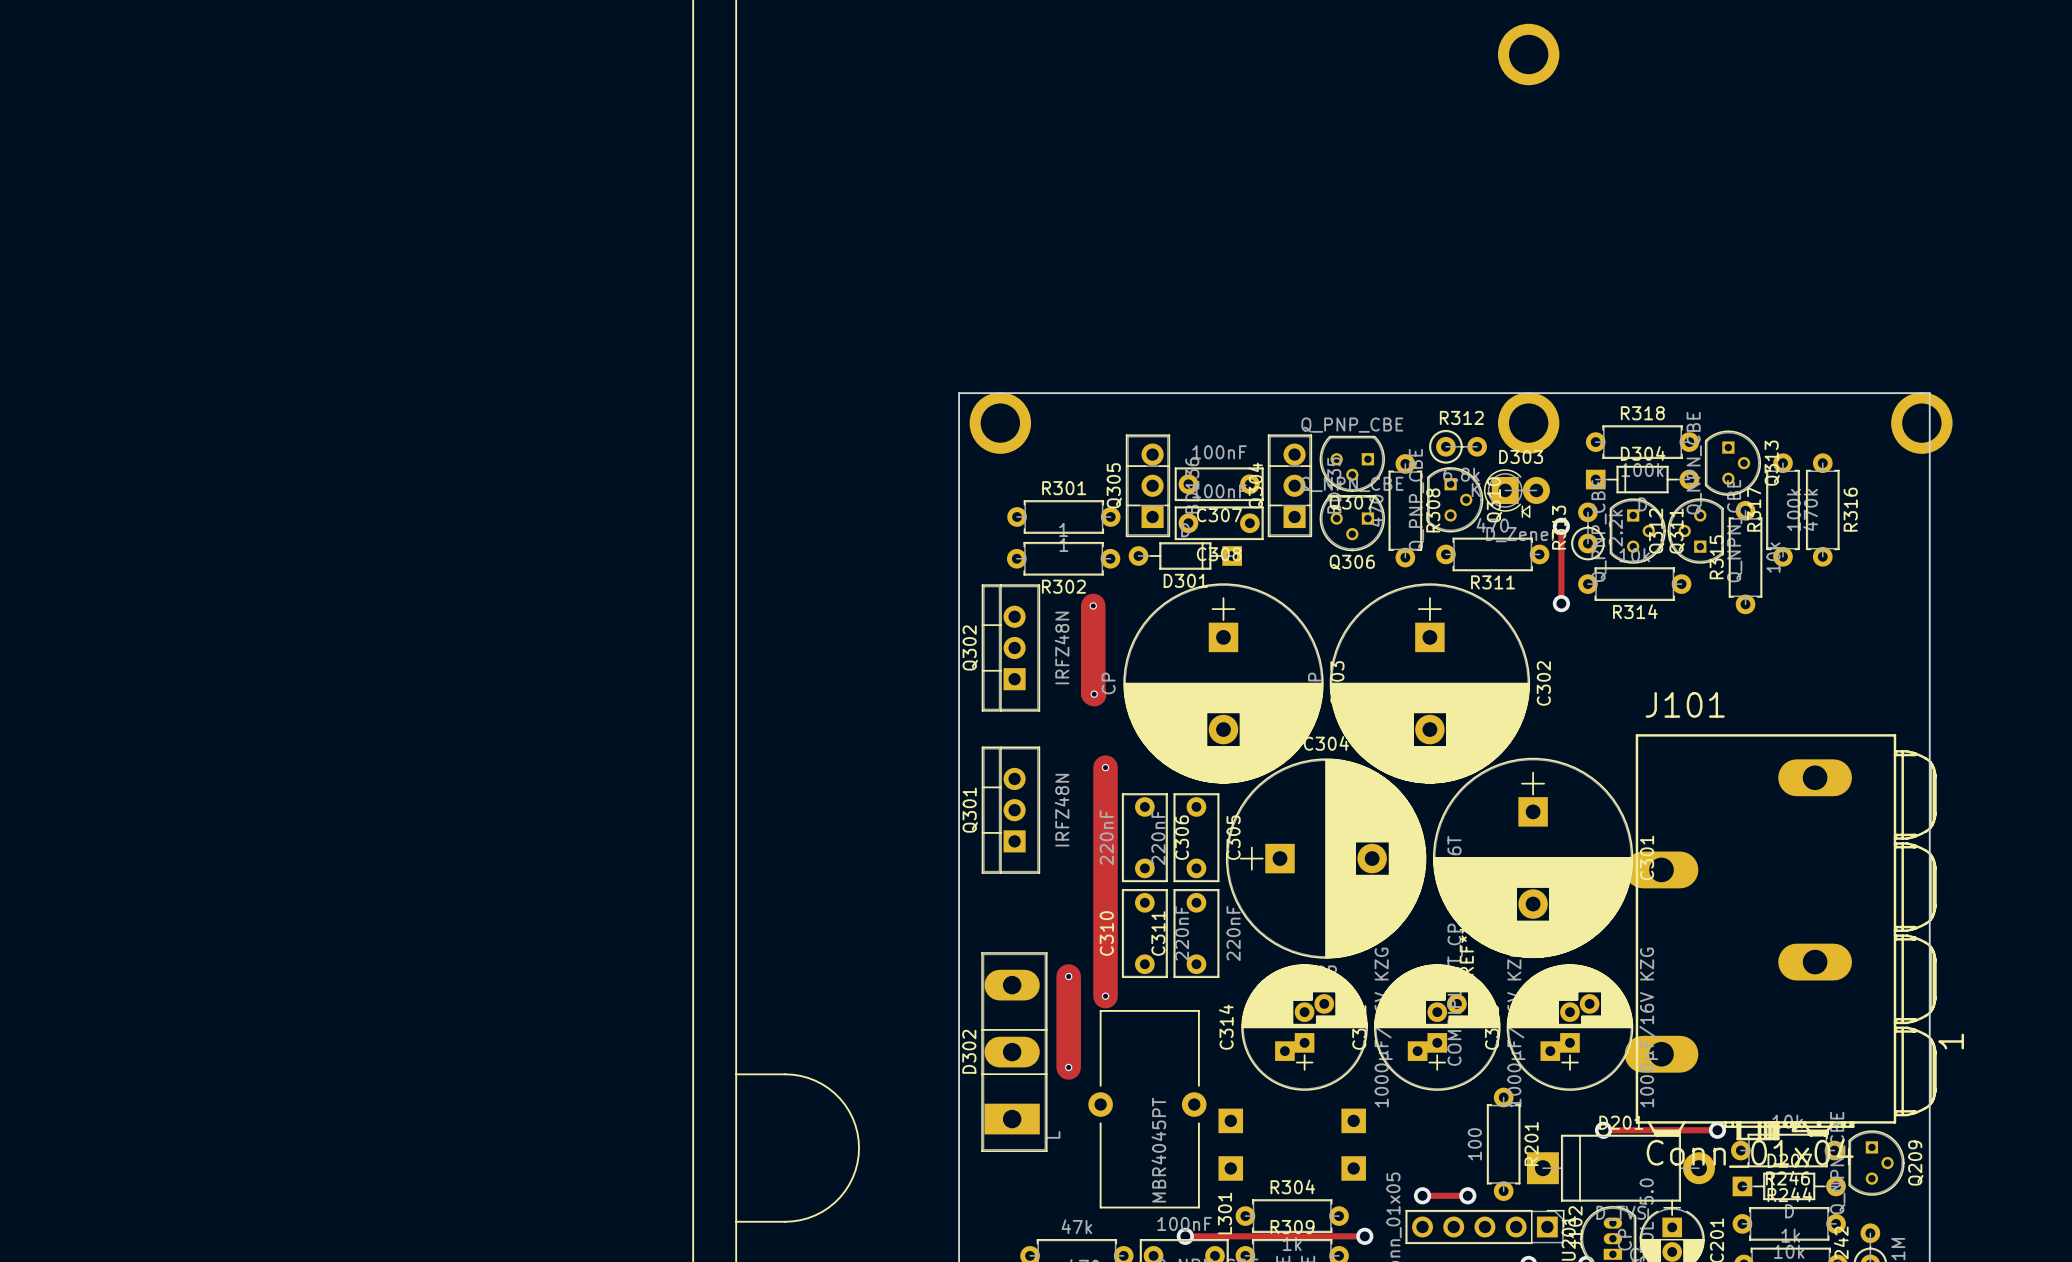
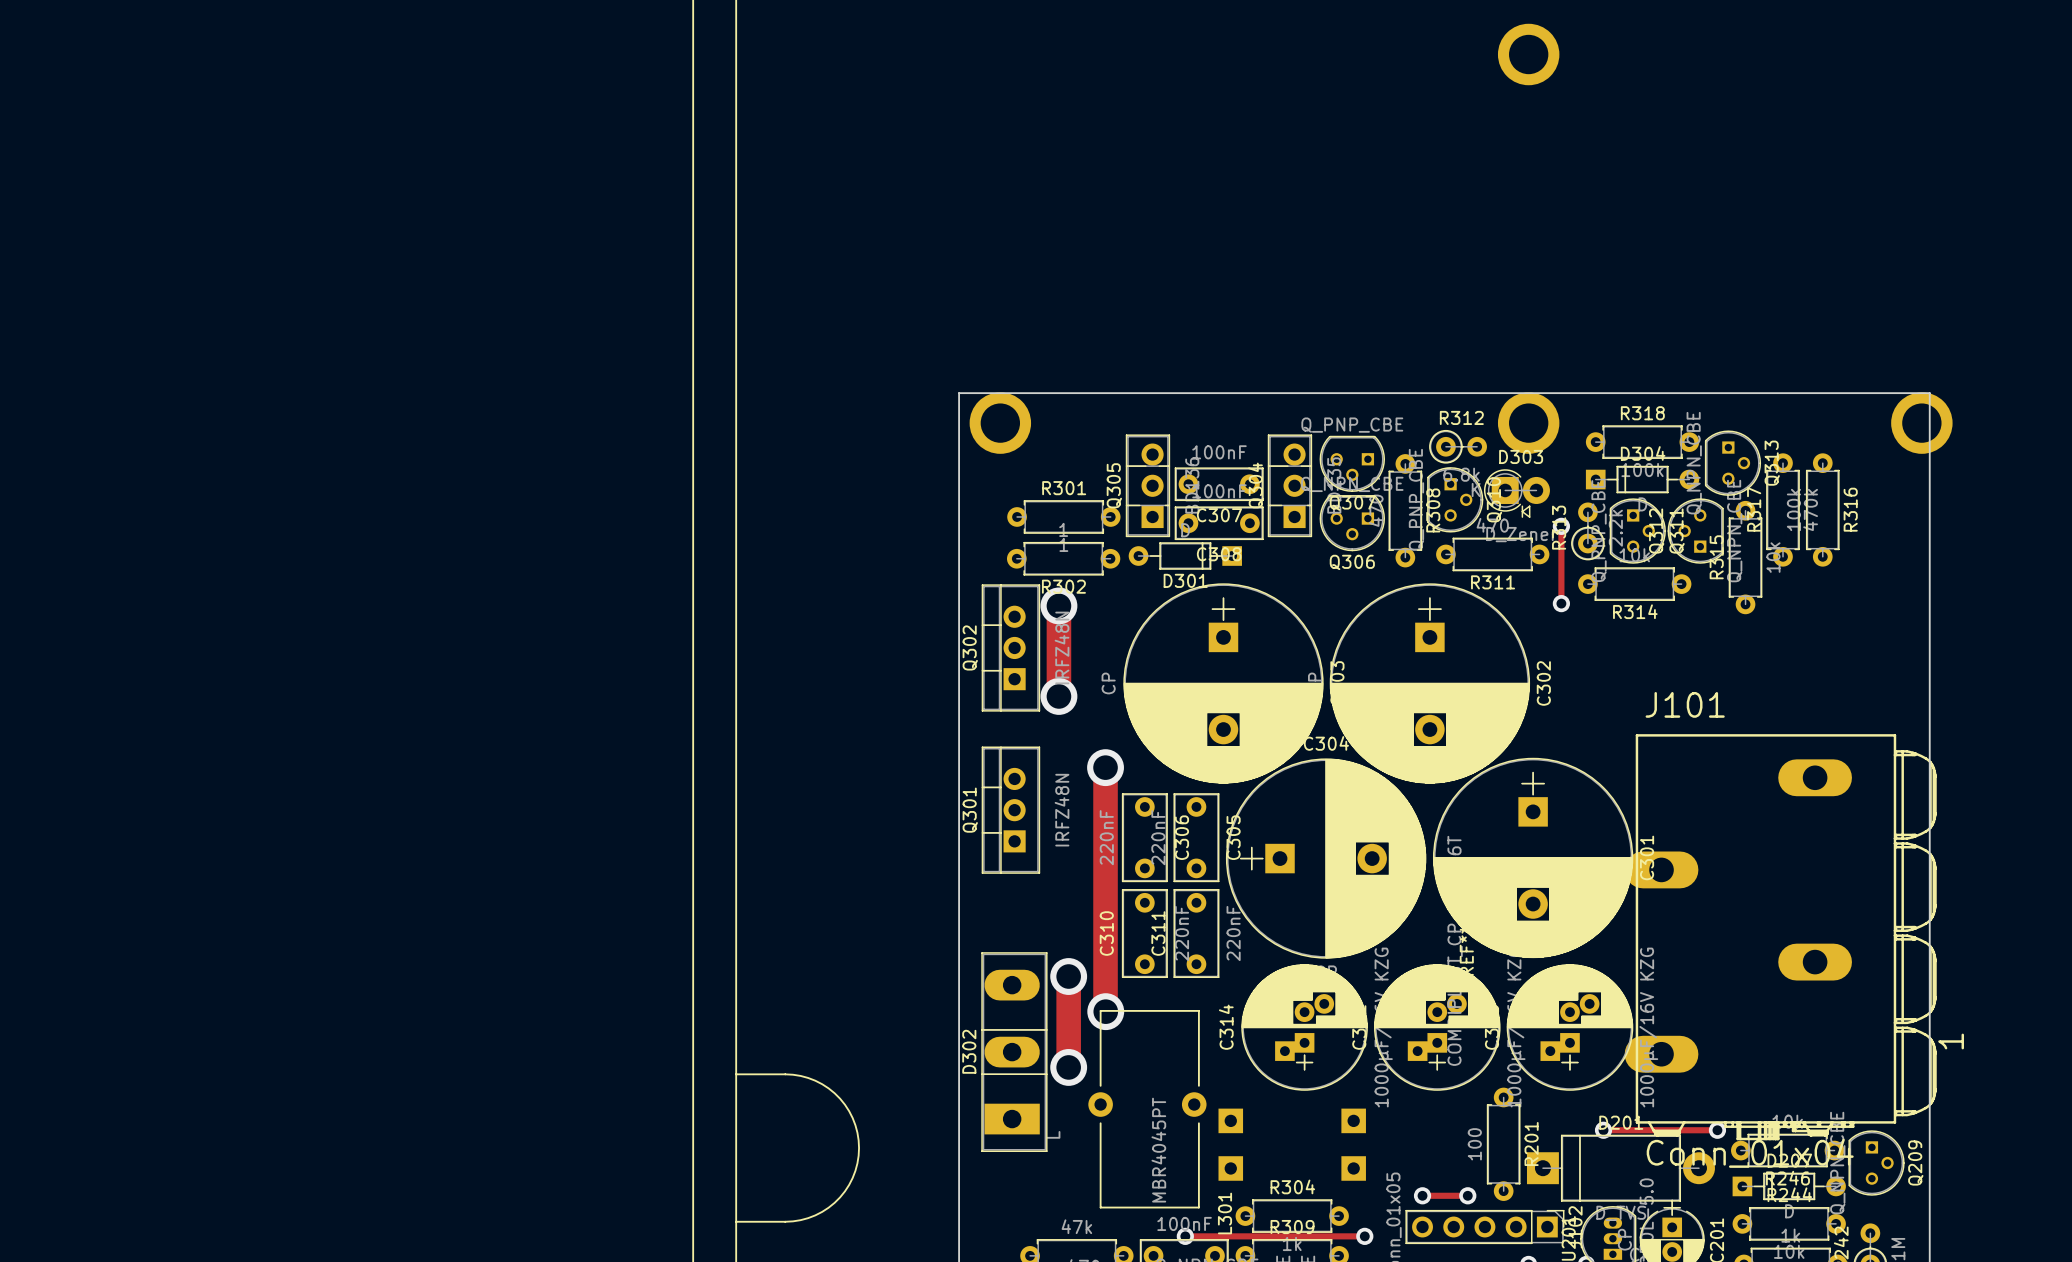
track: none -> (1058, 605) (1058, 696)
via: none -> (1058, 605)
track: (1093, 605) (1094, 694) -> none
via: (1093, 605) -> none
via: (1094, 694) -> none
via: none -> (1058, 696)
via size: [1101, 763, 1110, 772] -> [1087, 749, 1124, 787]
via size: [1064, 972, 1073, 981] -> [1050, 958, 1088, 995]
via: (1105, 996) -> none
via: none -> (1105, 1011)
via size: [1064, 1063, 1073, 1072] -> [1050, 1049, 1088, 1086]

